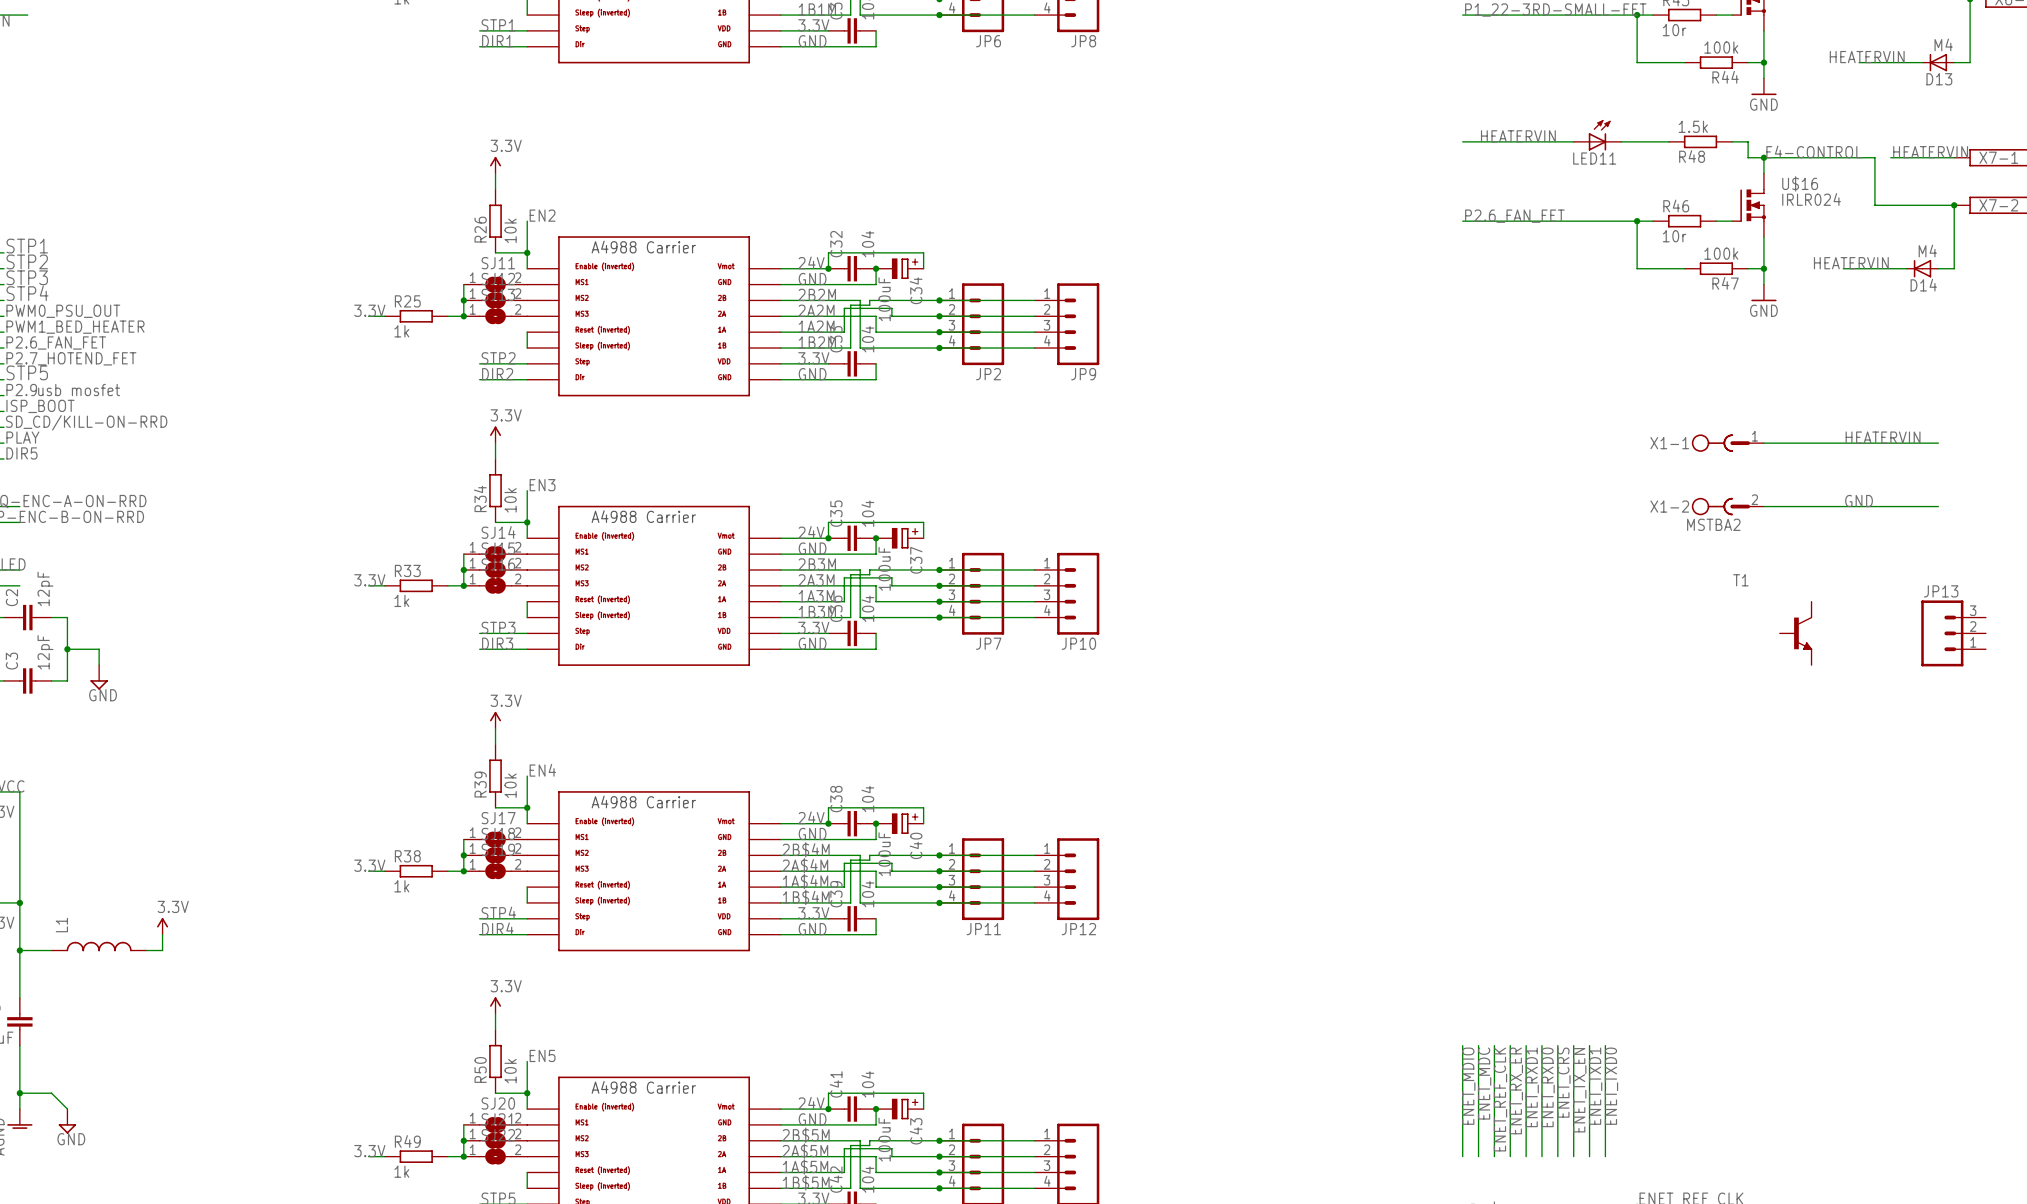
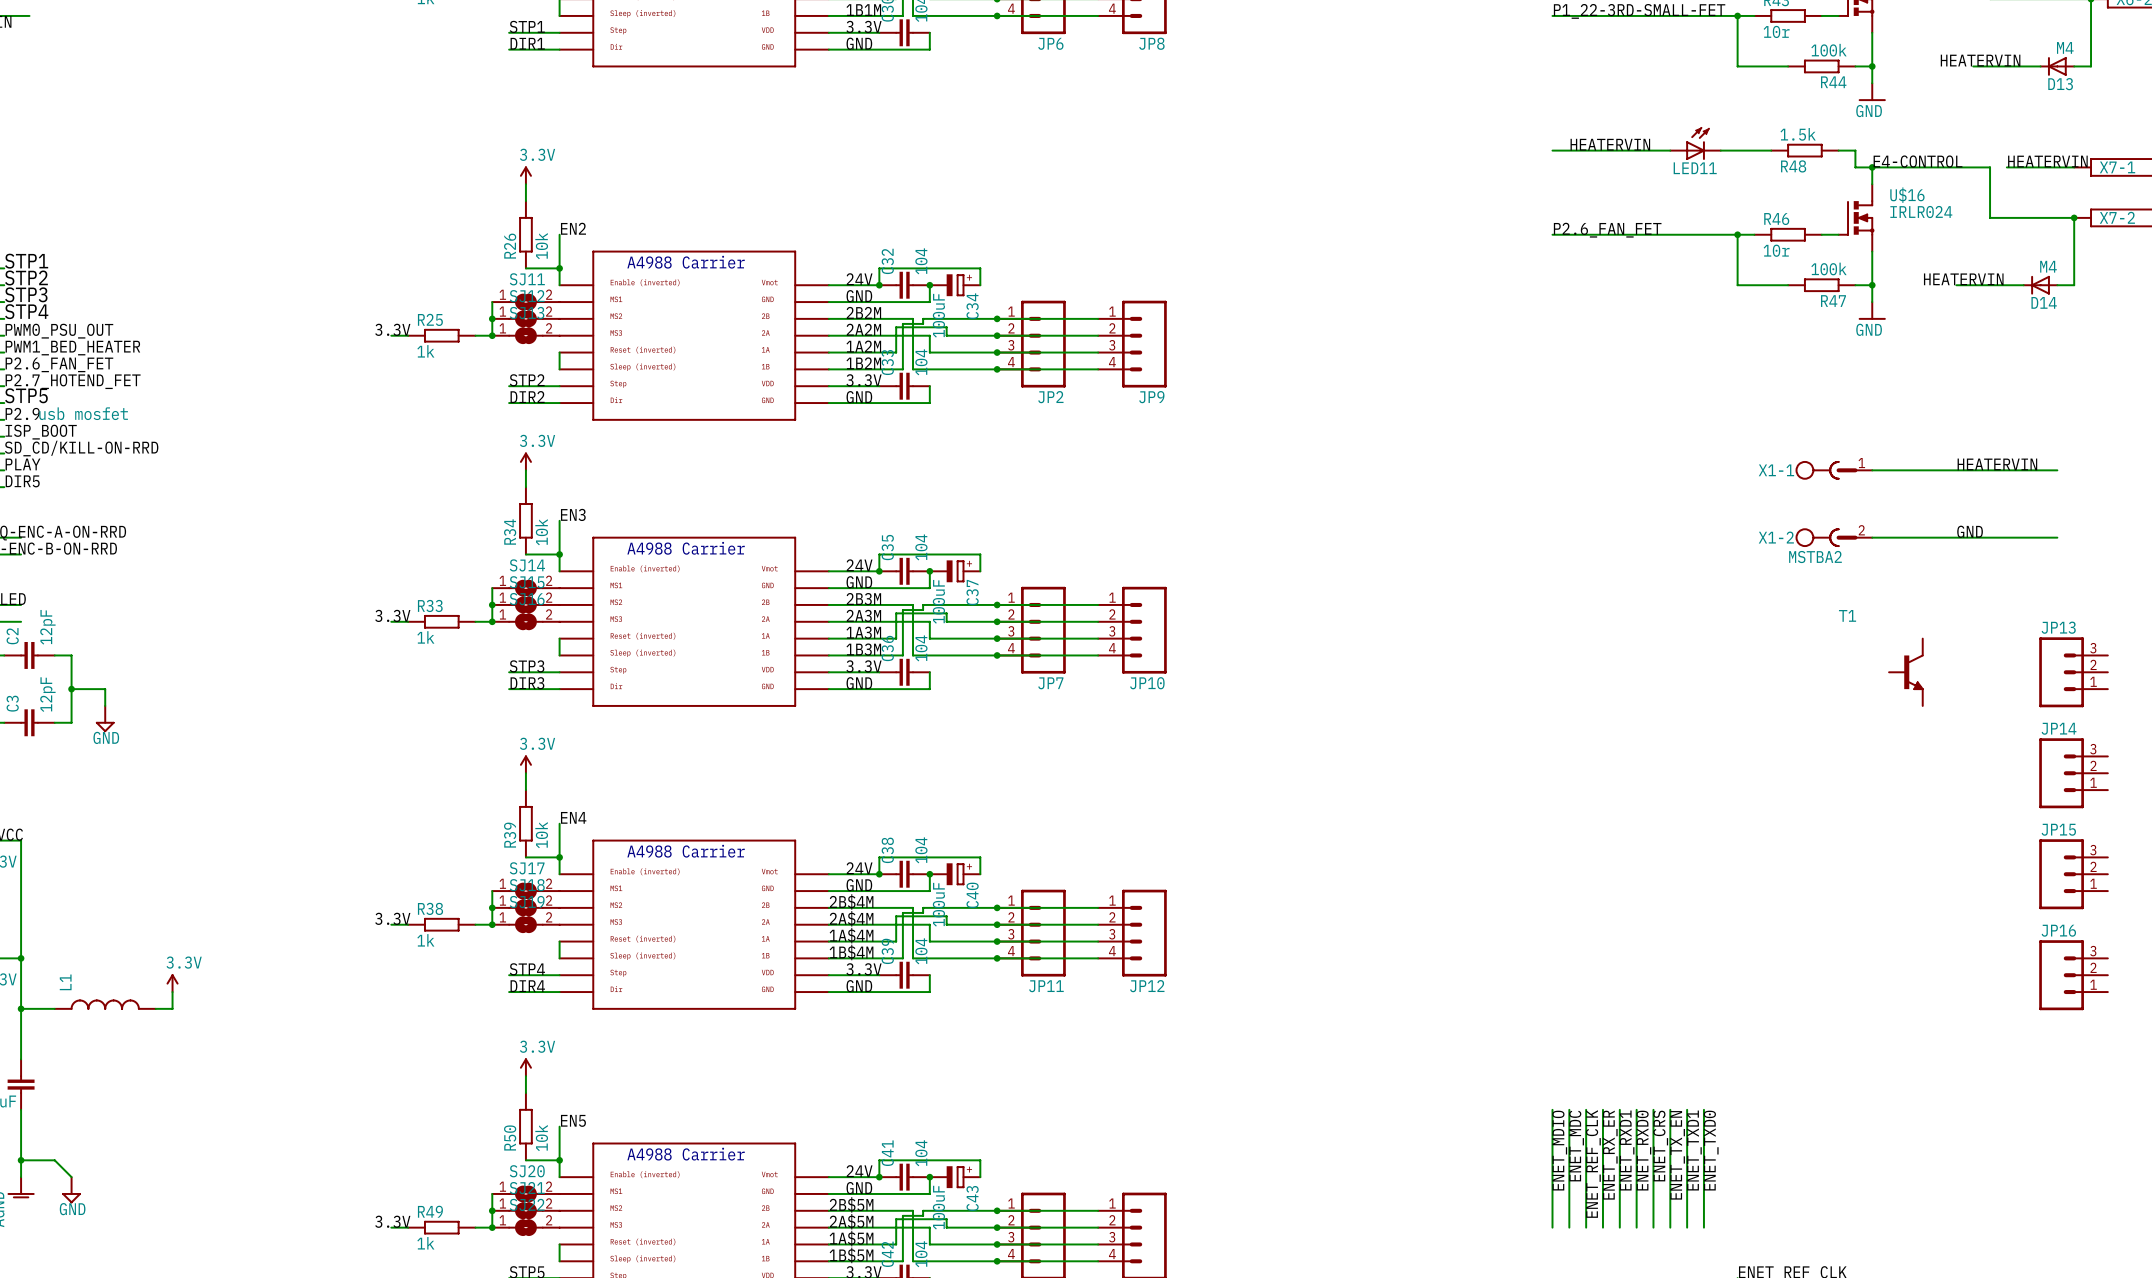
JP14: none -> (2073, 773)
JP15: none -> (2073, 874)
JP16: none -> (2073, 975)

